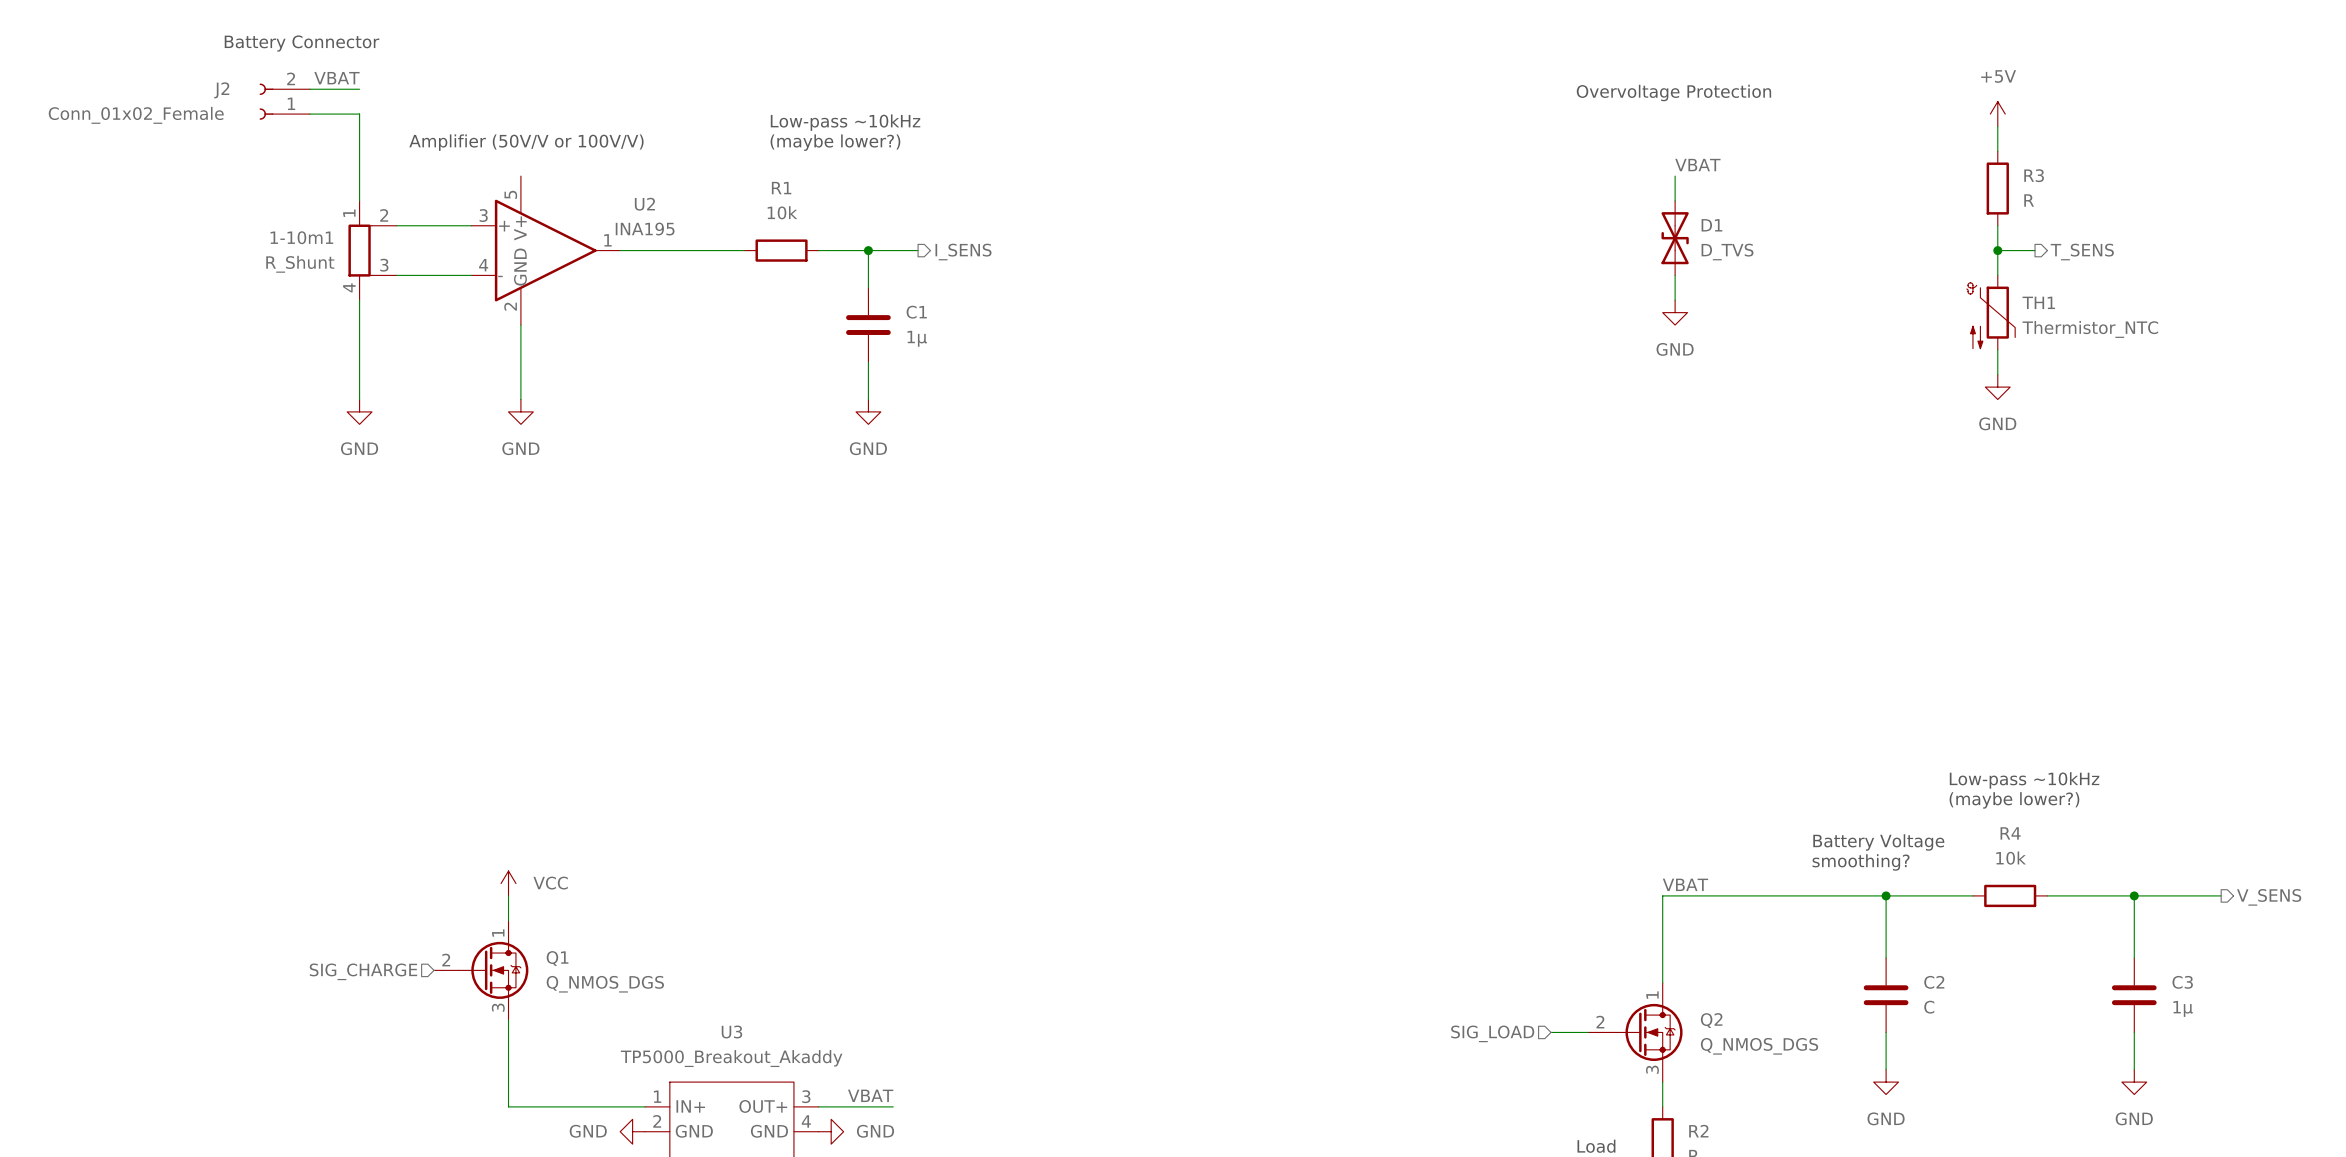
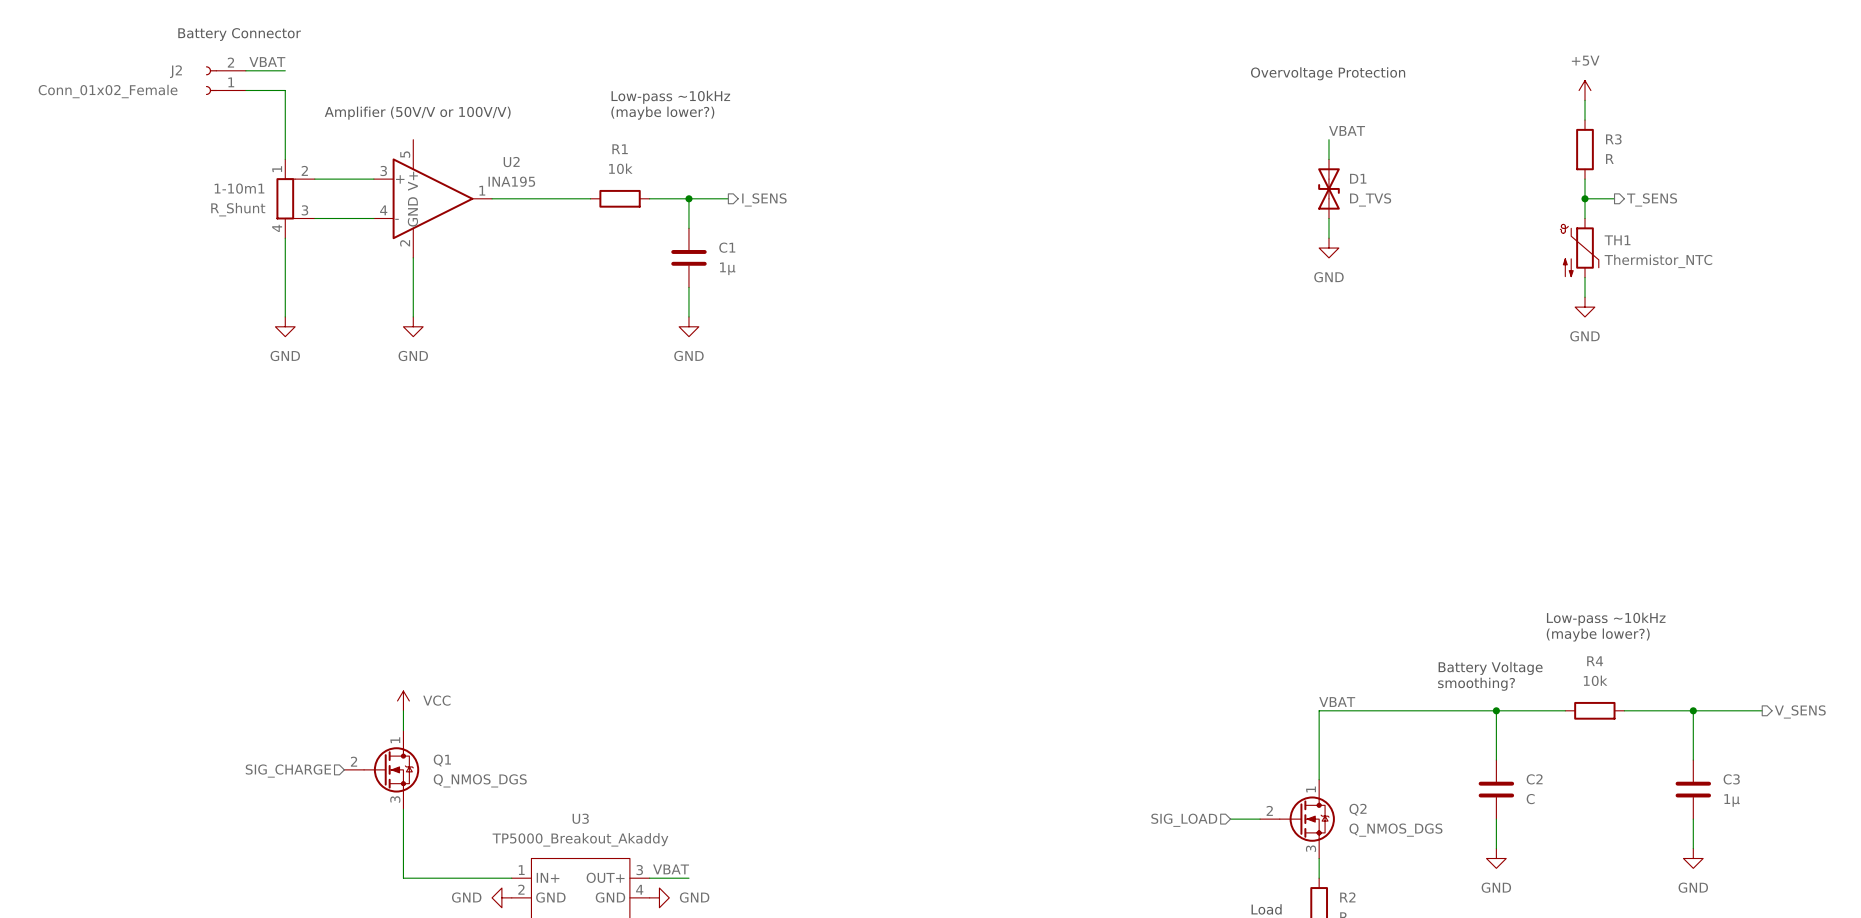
label position: VBAT (870, 1095) -> VBAT (671, 869)
wire: (868, 1106) (893, 1106) -> none

